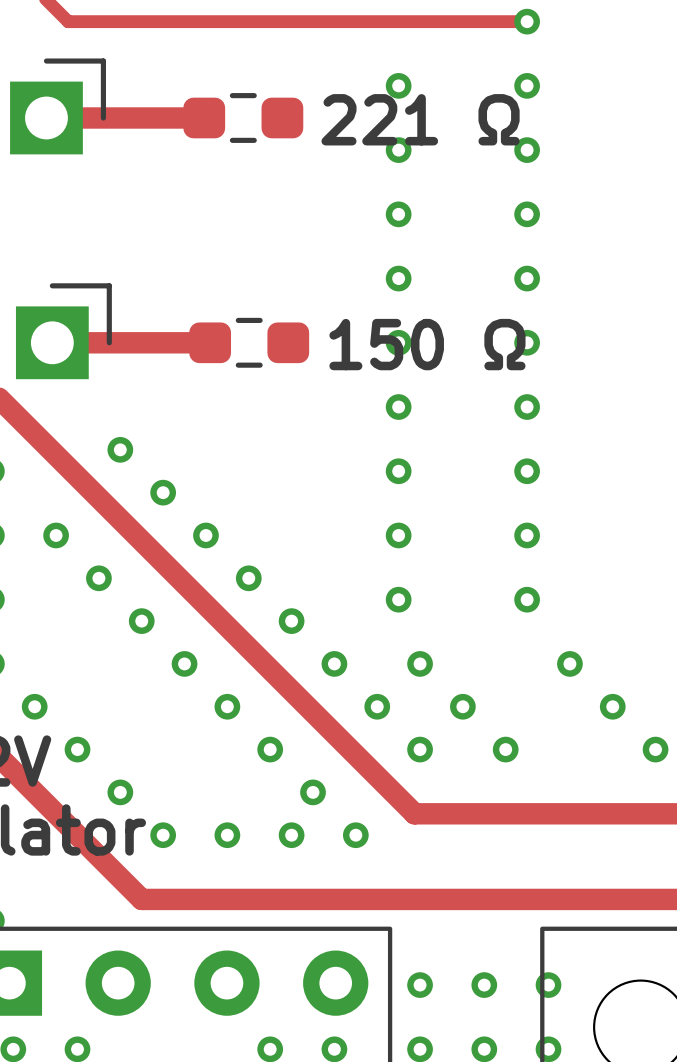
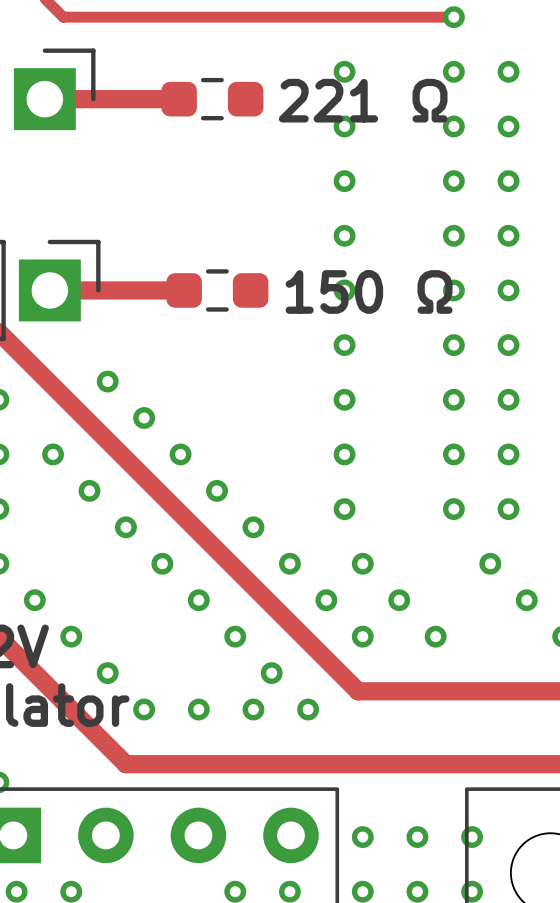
via: none -> (508, 71)
via: none -> (508, 126)
via: none -> (508, 181)
via: none -> (508, 235)
via: none -> (508, 290)
via: none -> (508, 345)
via: none -> (508, 399)
via: none -> (508, 454)
via: none -> (508, 509)

